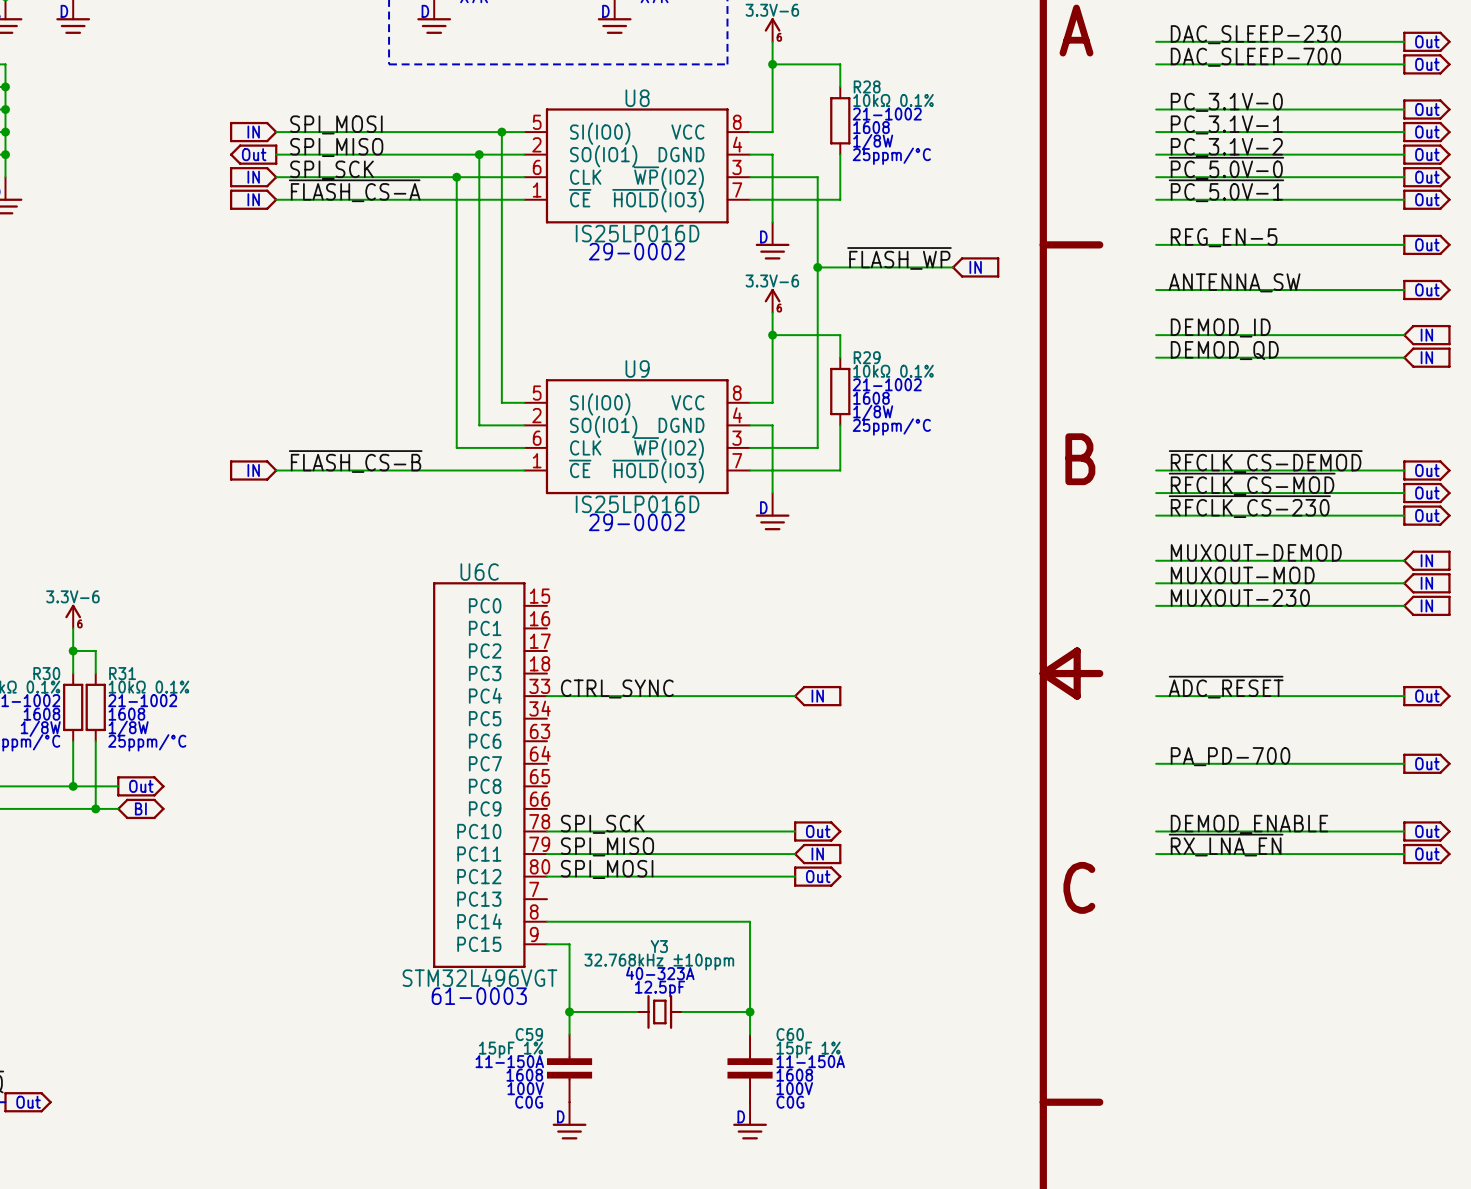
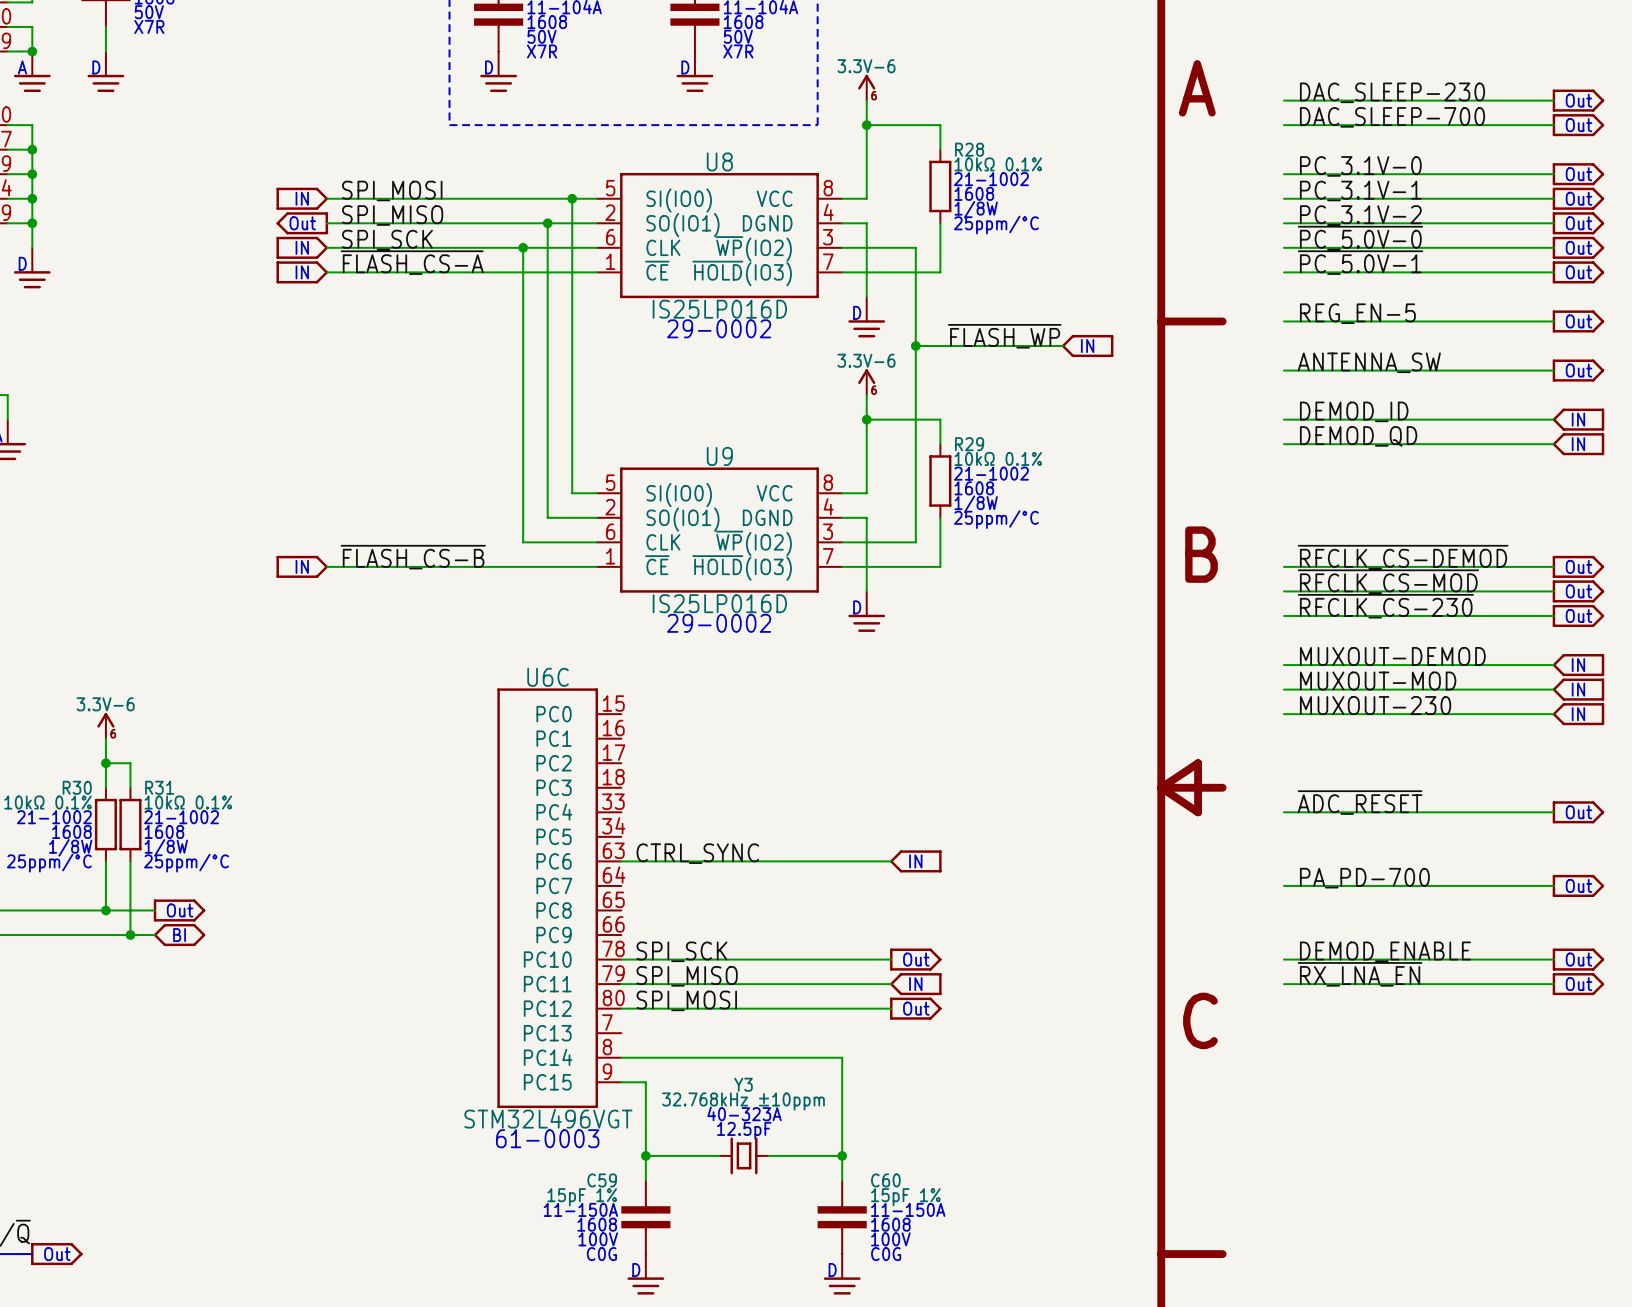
label position: CTRL_SYNC (617, 688) -> CTRL_SYNC (697, 853)
wire: (546, 696) (795, 696) -> (621, 861) (891, 861)
part position: (817, 696) -> (915, 861)

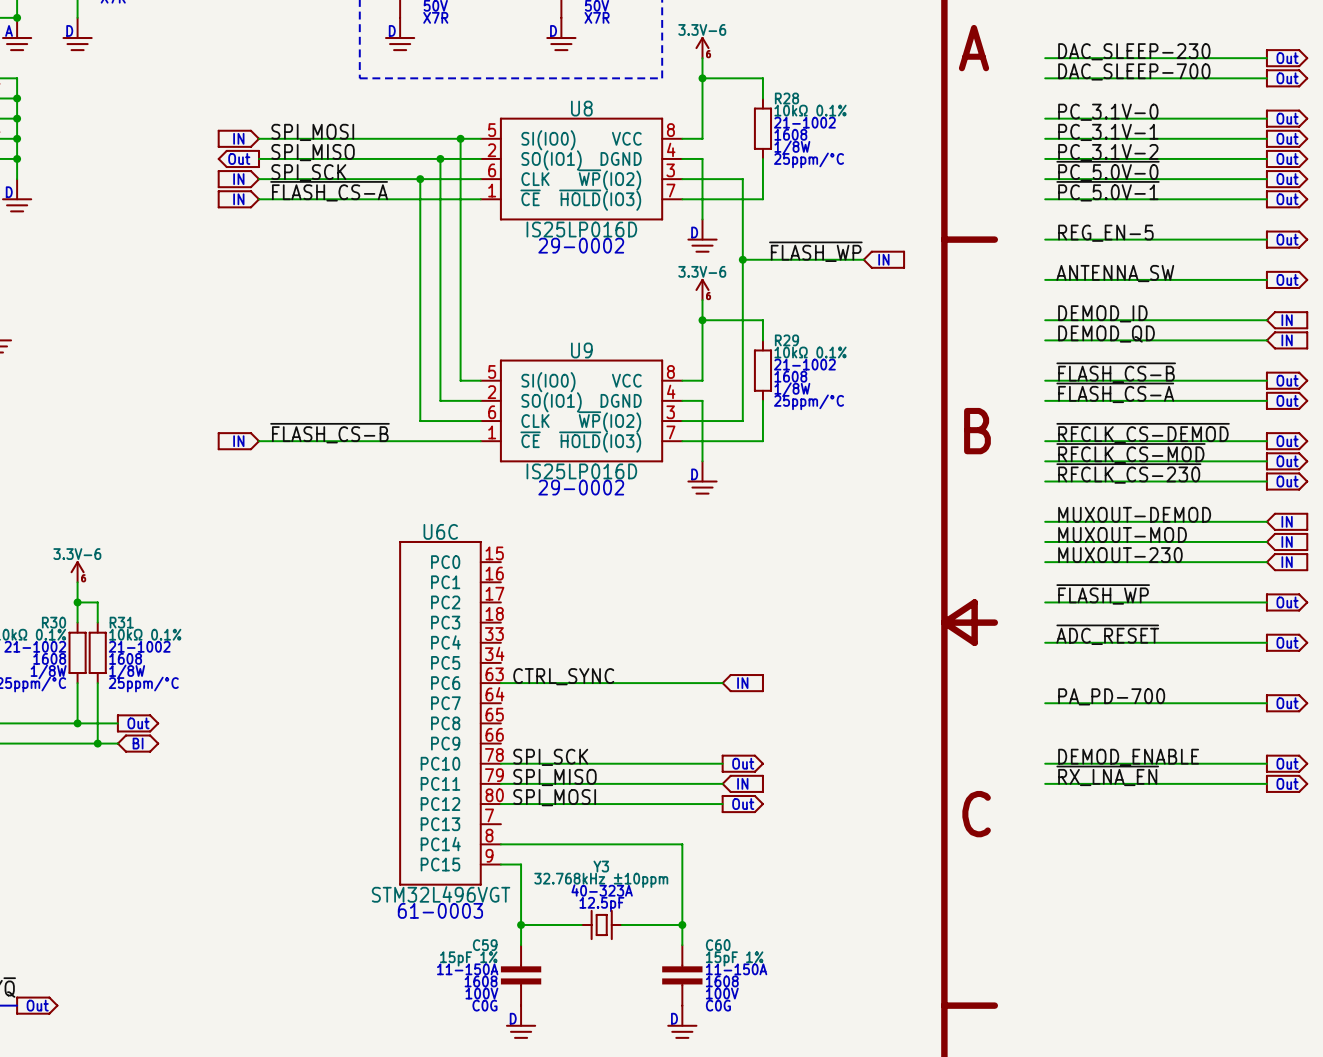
label: none -> ~{FLASH_CS-B} (1116, 372)
wire: none -> (1045, 380) (1266, 380)
part: none -> (1287, 380)
label: none -> ~{FLASH_CS-A} (1115, 392)
wire: none -> (1045, 400) (1266, 400)
part: none -> (1287, 400)
label: none -> ~{FLASH_WP} (1103, 594)
wire: none -> (1045, 602) (1266, 602)
part: none -> (1287, 602)

